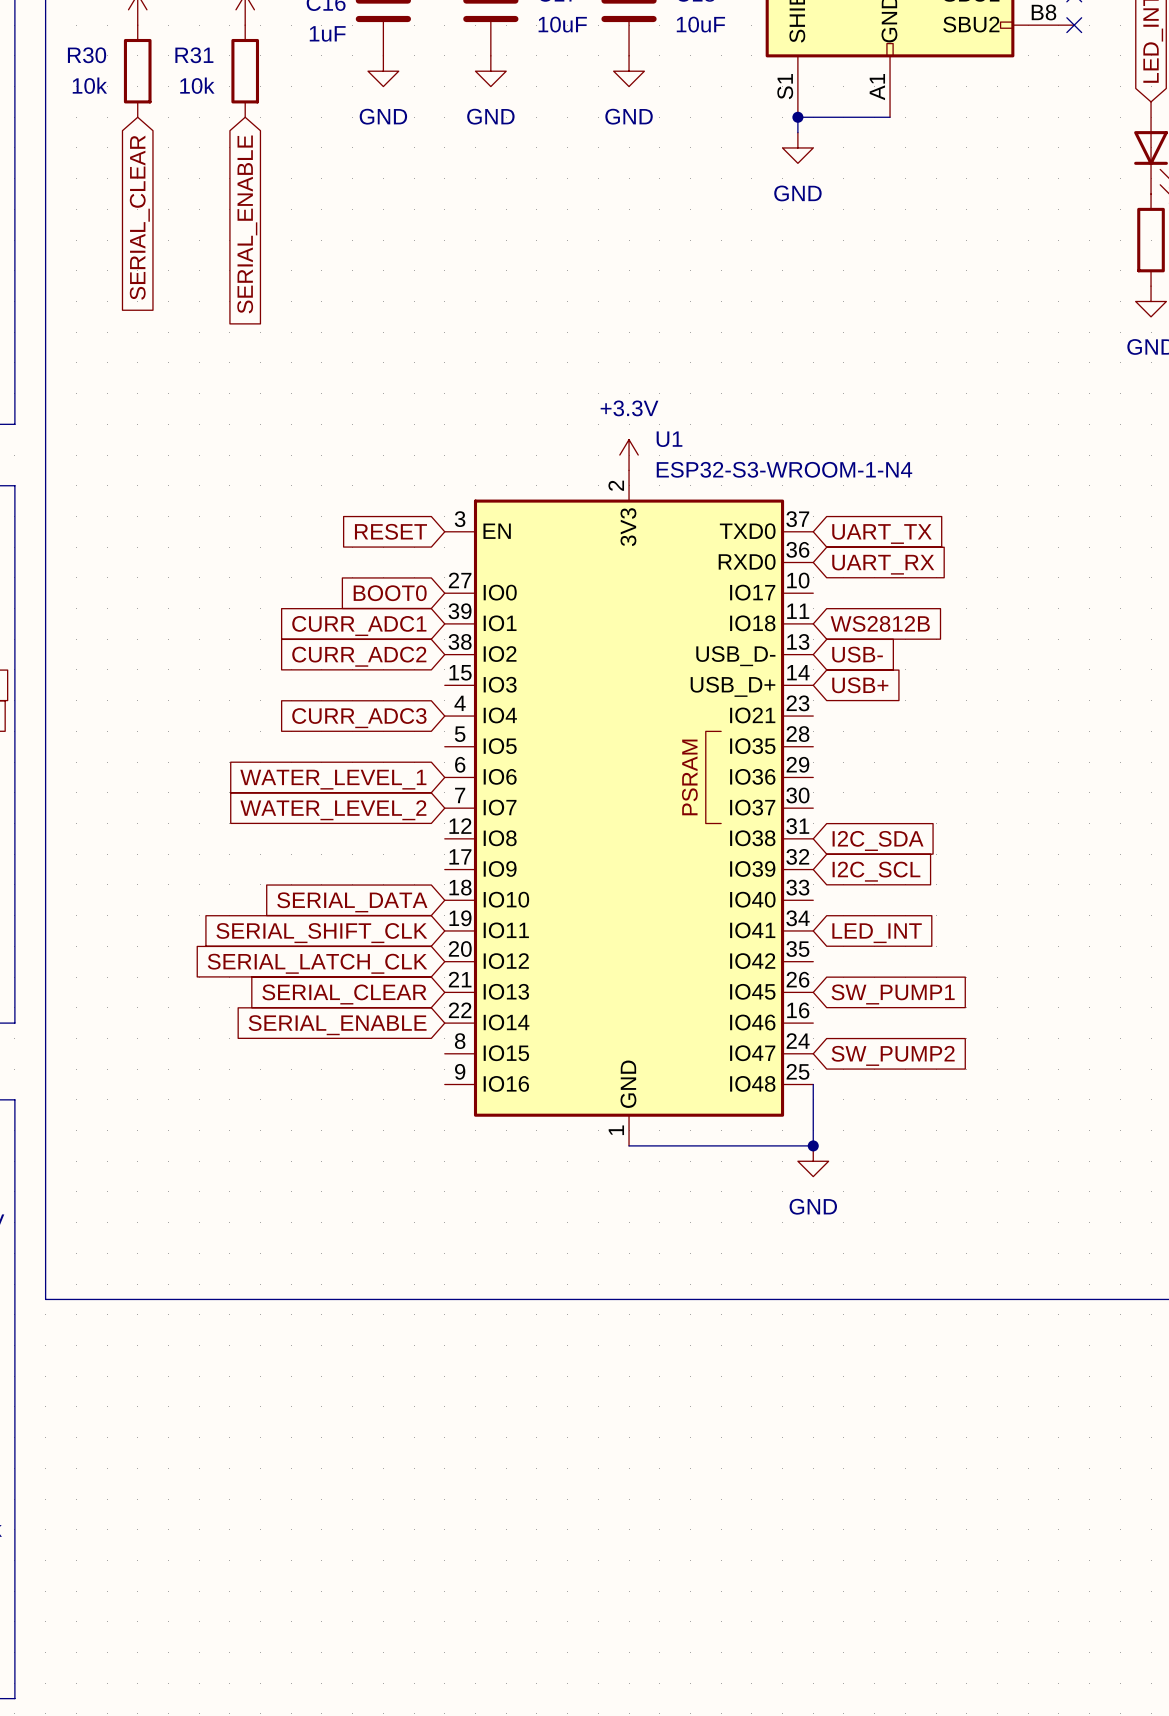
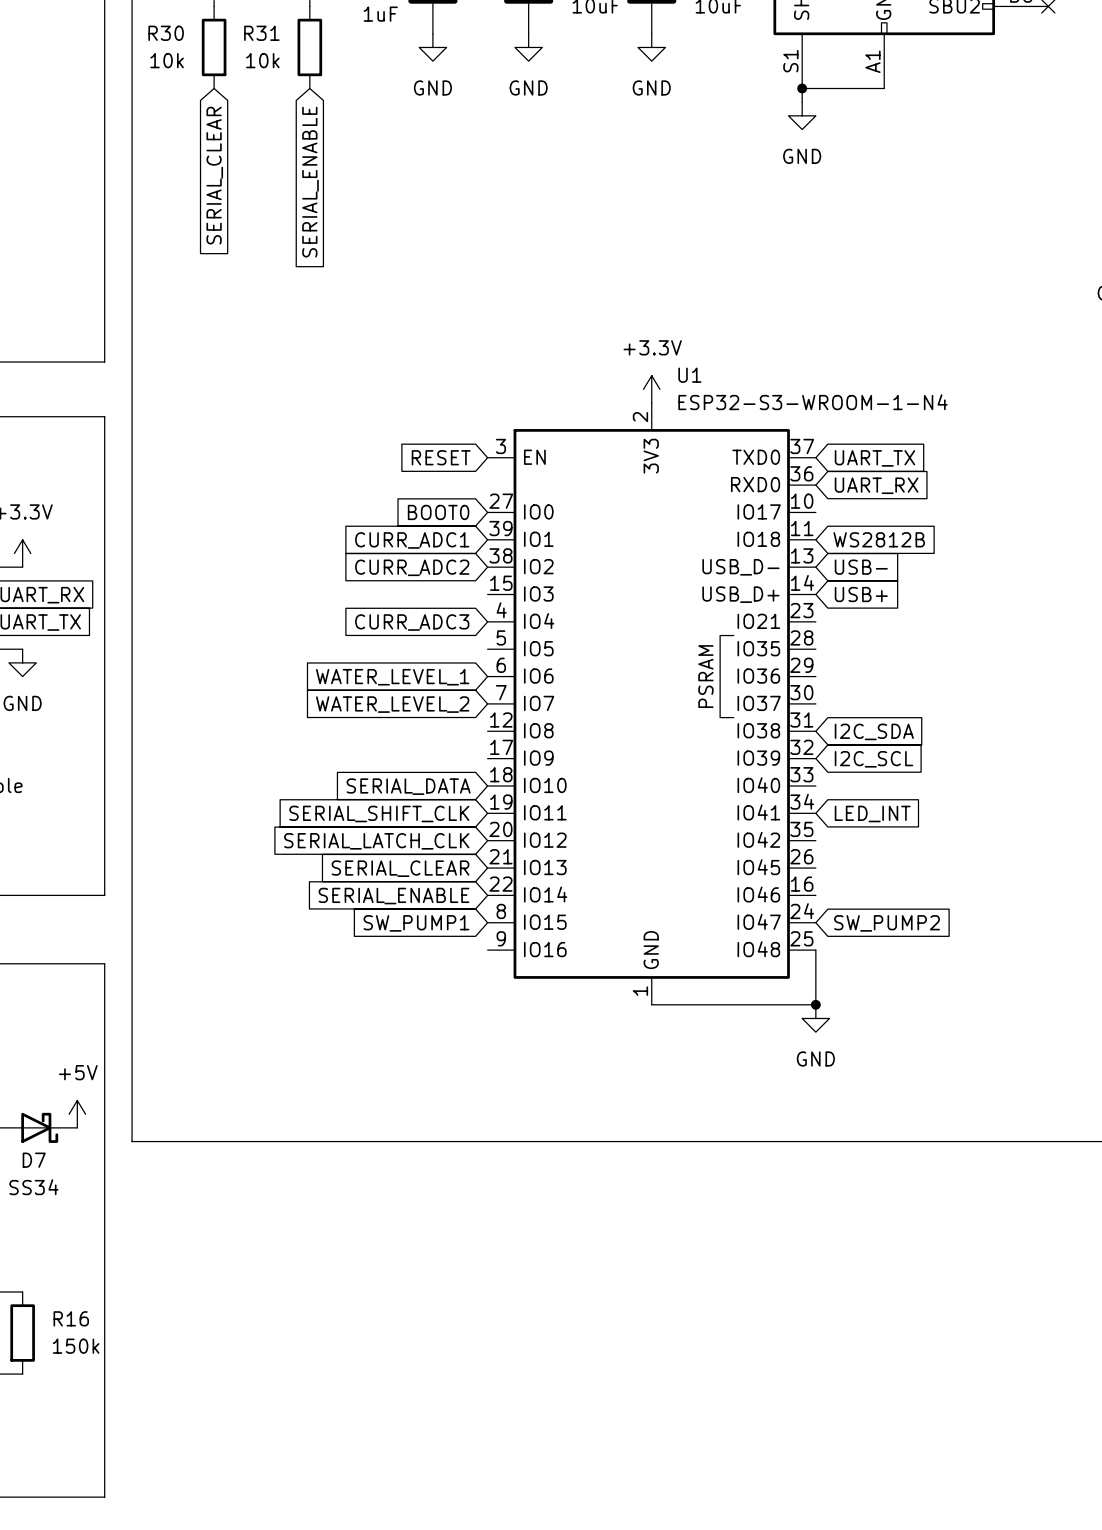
global label: SW_PUMP1 (893, 994) -> none
global label: none -> SW_PUMP1 (416, 923)

